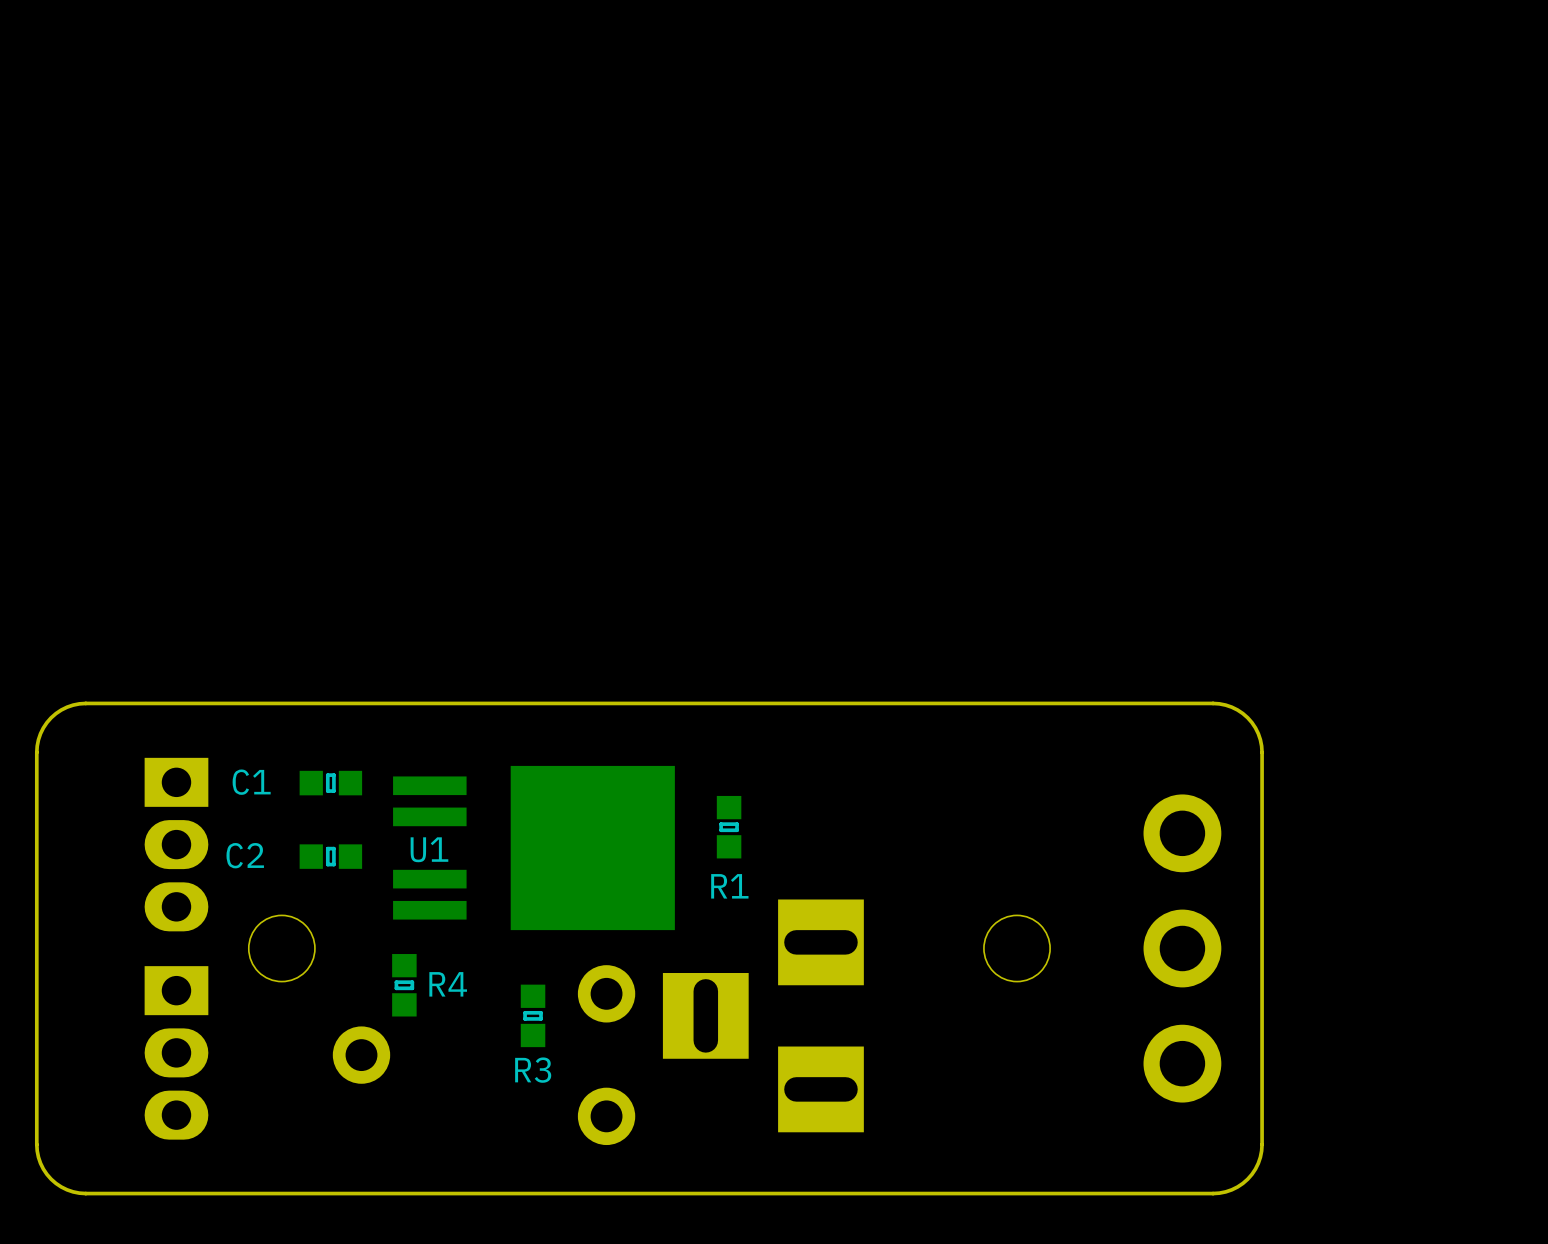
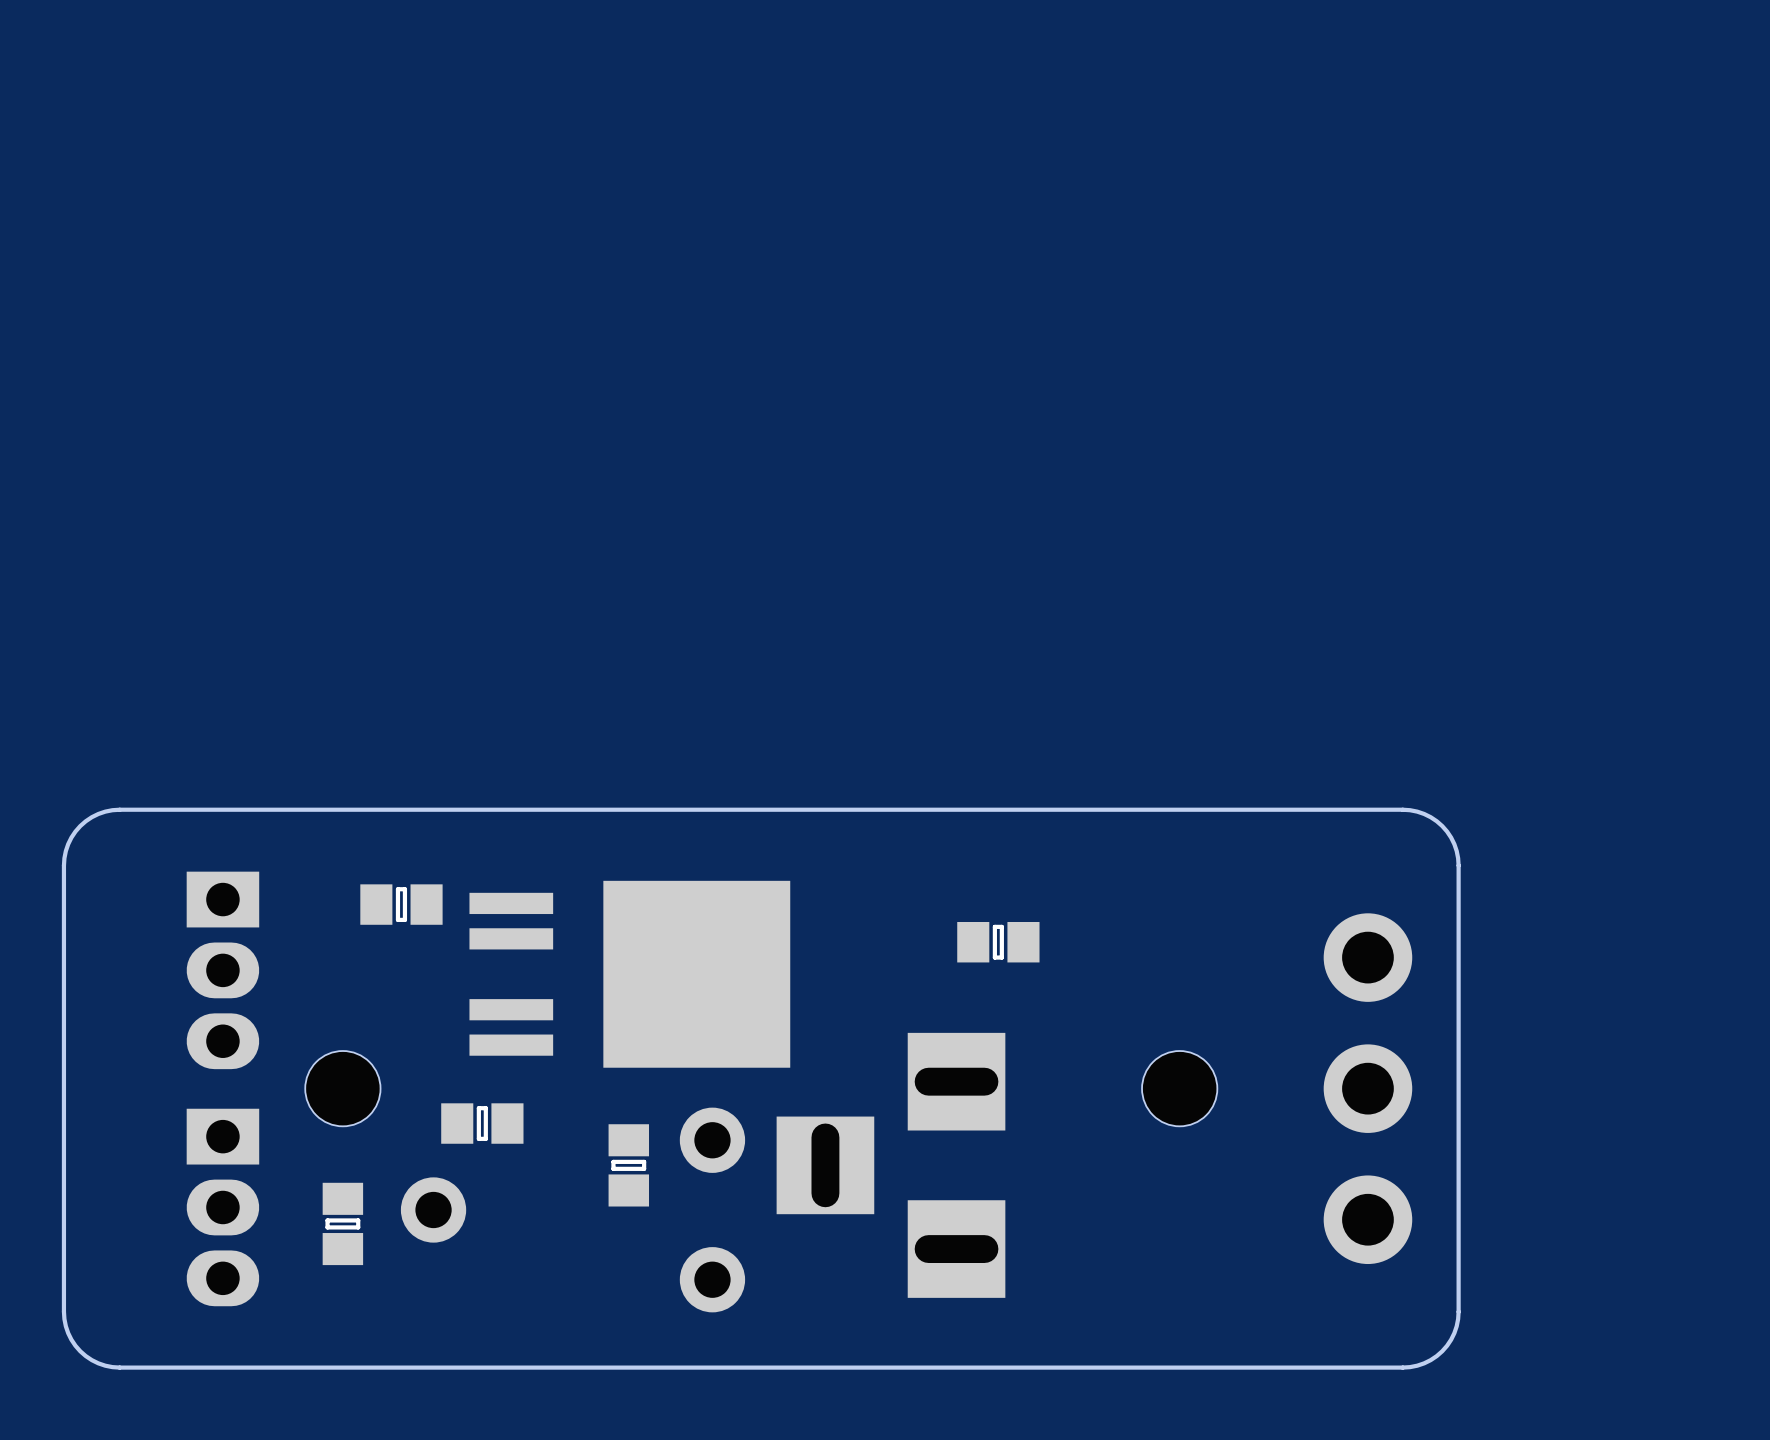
C1: (330, 783) -> none
part: none -> (401, 904)
part: none -> (998, 942)
R1: (729, 827) -> none
U1 name: U1 (429, 849) -> none
C2: (330, 856) -> none
part: none -> (482, 1123)
R4: (404, 985) -> none
R3: (533, 1015) -> none
part: none -> (628, 1165)
part: none -> (342, 1223)

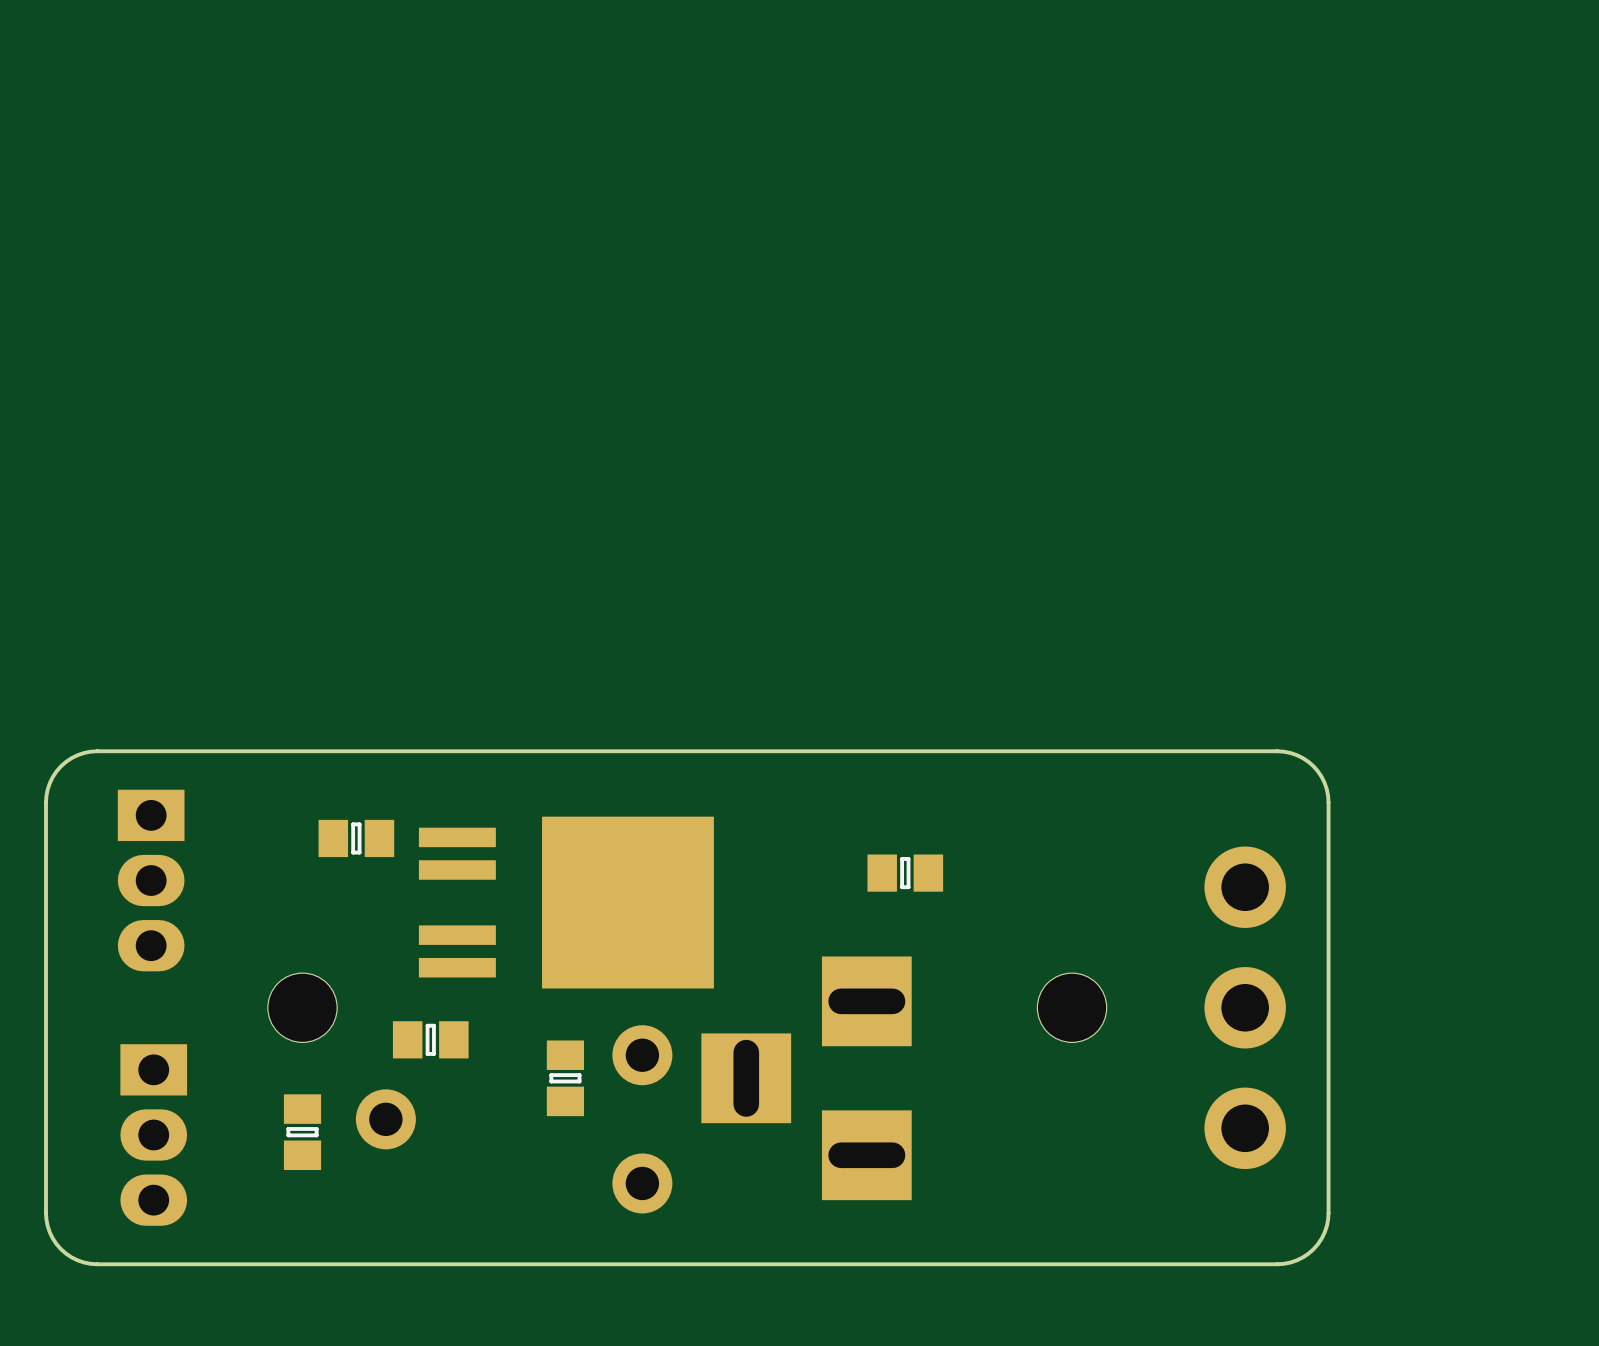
part position: (222, 970) -> (151, 880)
part position: (222, 1207) -> (153, 1134)

